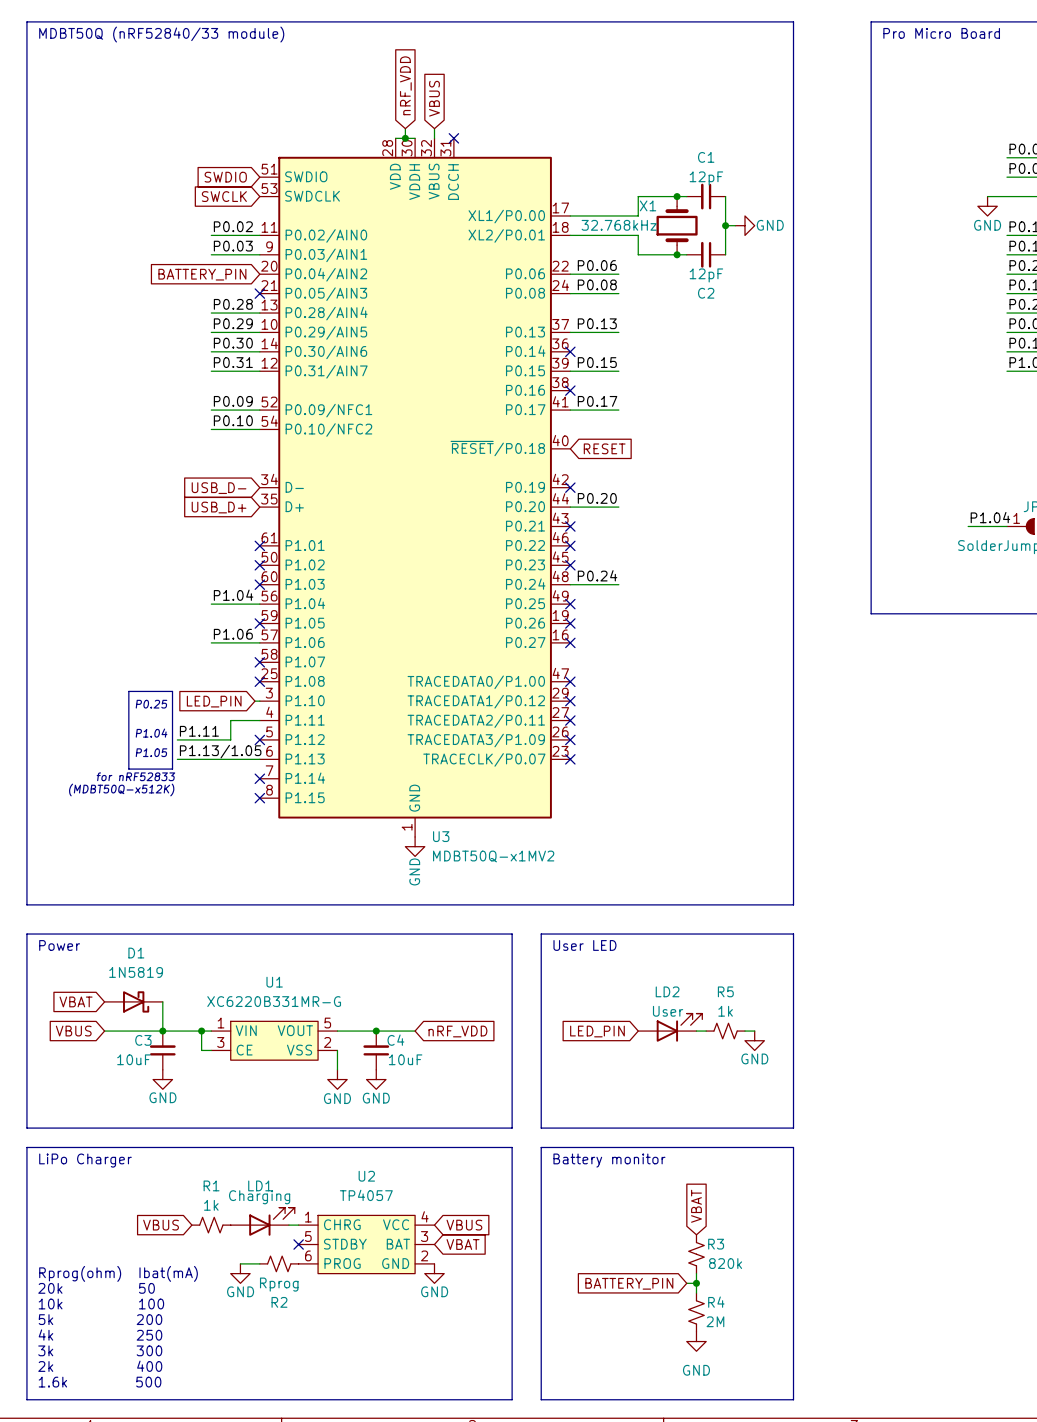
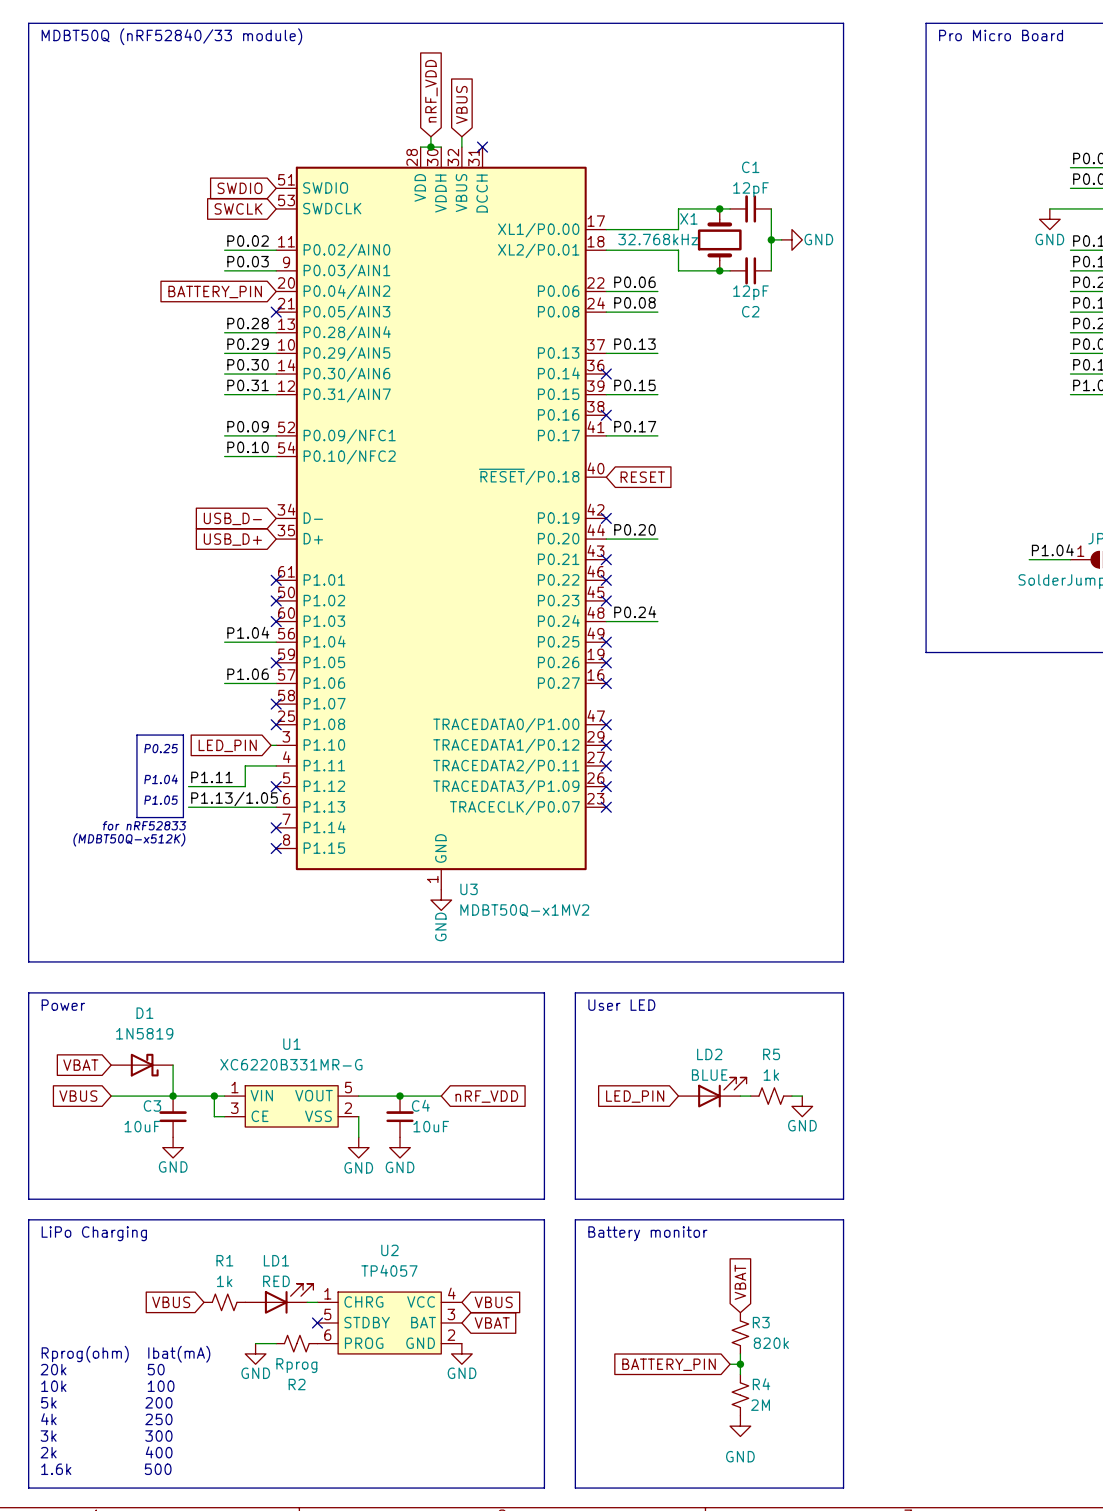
LD2 value: User (668, 1011) -> BLUE (709, 1075)
text: LiPo Charger (85, 1160) -> LiPo Charging (94, 1233)
LD1 value: Charging (259, 1197) -> RED (276, 1281)

